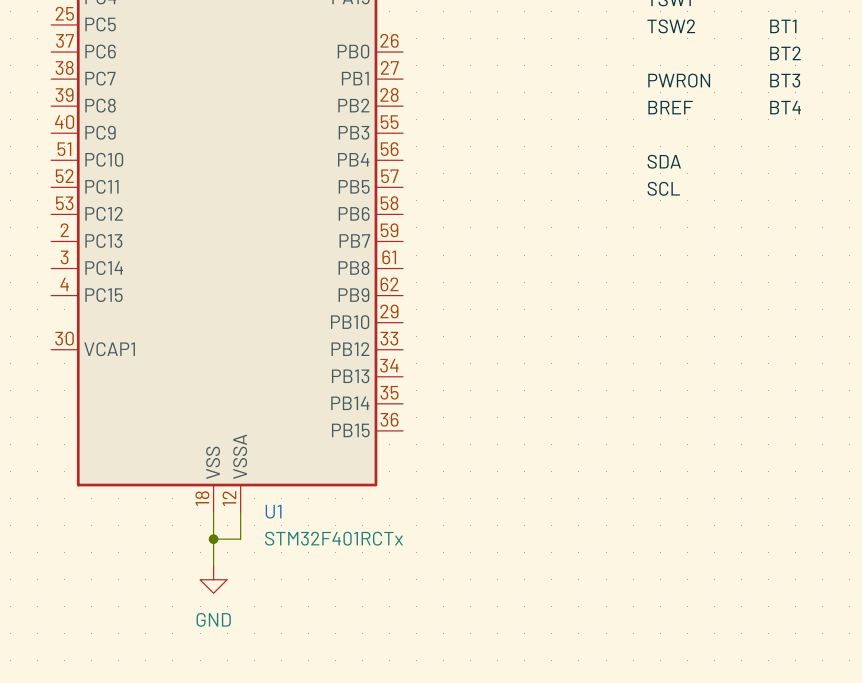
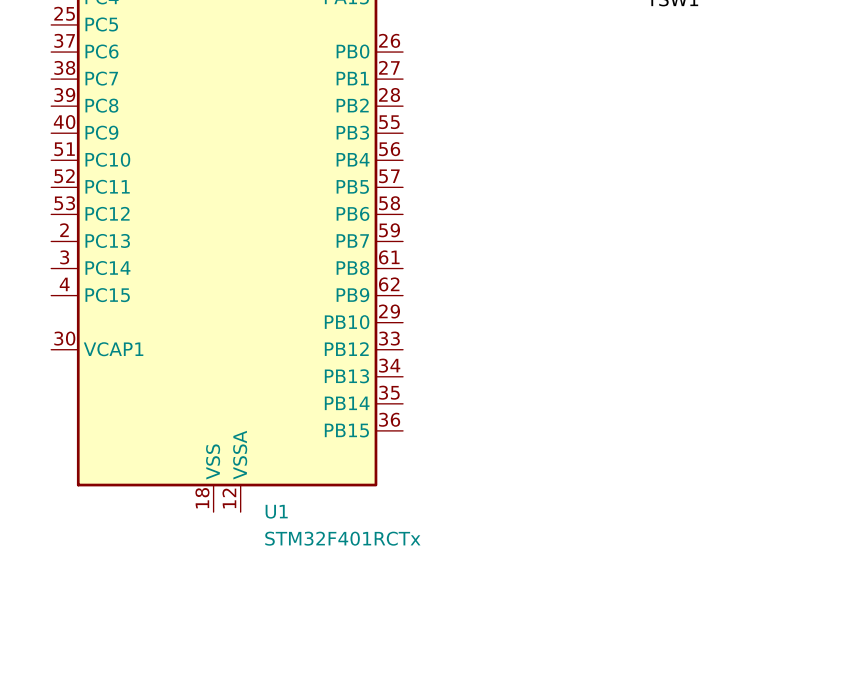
label: TSW2 (671, 26) -> none
label: BT1 (783, 26) -> none
label: BT2 (785, 53) -> none
label: PWRON (679, 80) -> none
label: BT3 (785, 80) -> none
label: BREF (670, 107) -> none
label: BT4 (785, 107) -> none
label: SDA (664, 161) -> none
label: SCL (663, 188) -> none
wire: (213, 512) (213, 566) -> none
wire: (240, 512) (240, 539) (213, 539) -> none
junction: (213, 539) -> none
power symbol: GND (213, 579) -> none

